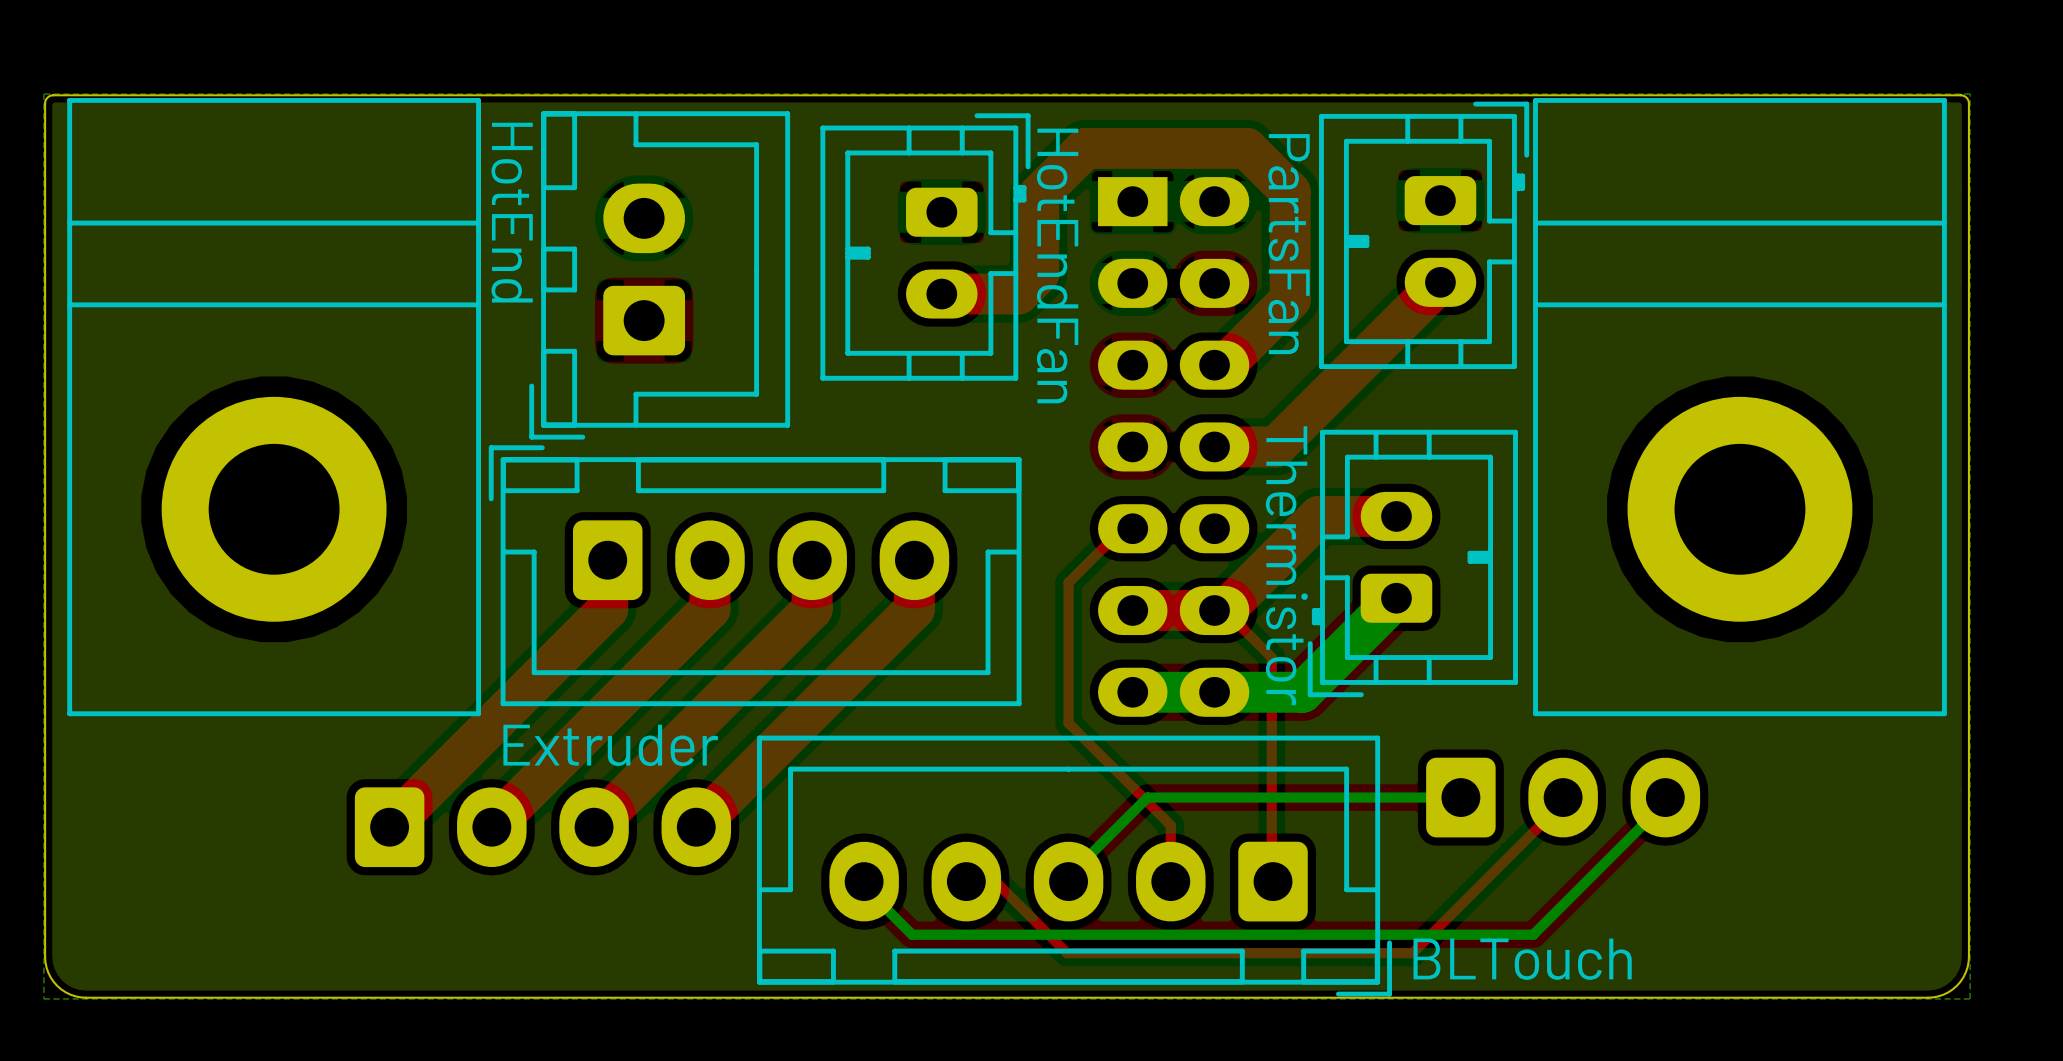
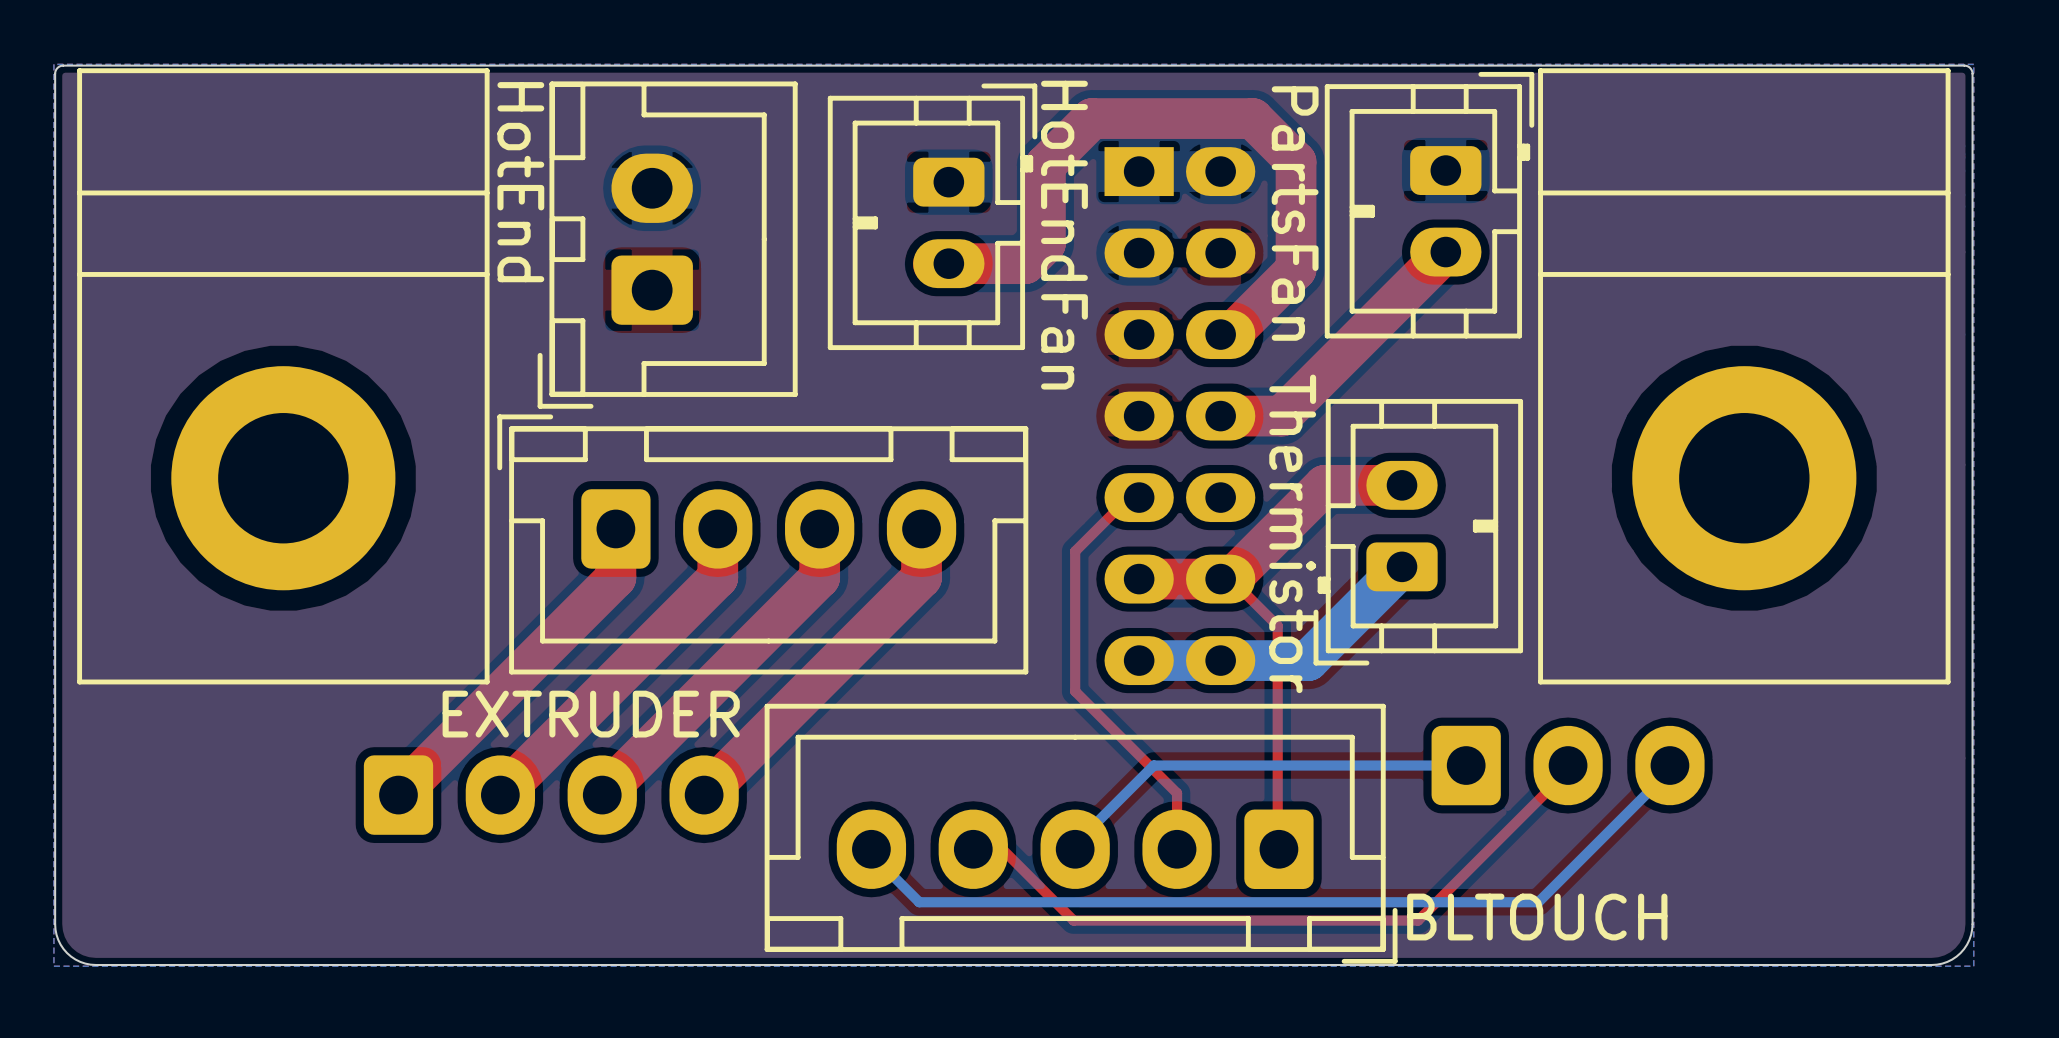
Extruder name: Extruder (610, 745) -> EXTRUDER (591, 714)
BLTouch name: BLTouch (1522, 959) -> BLTOUCH (1537, 917)

